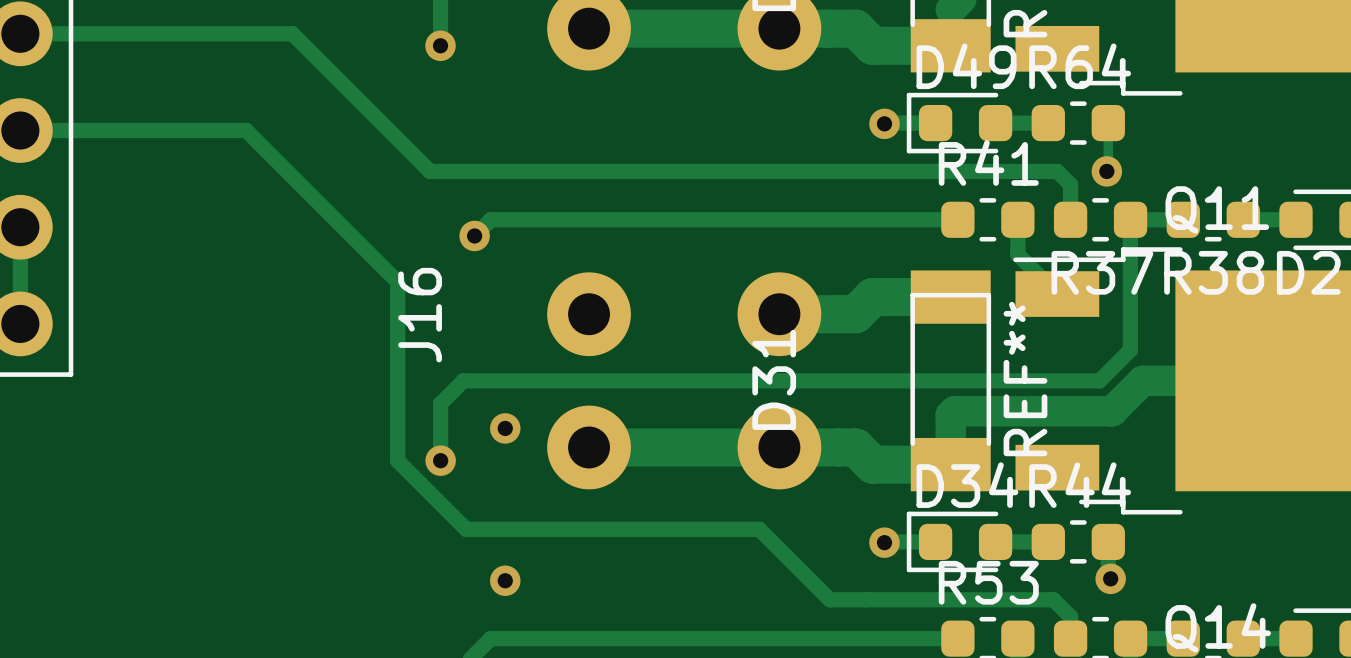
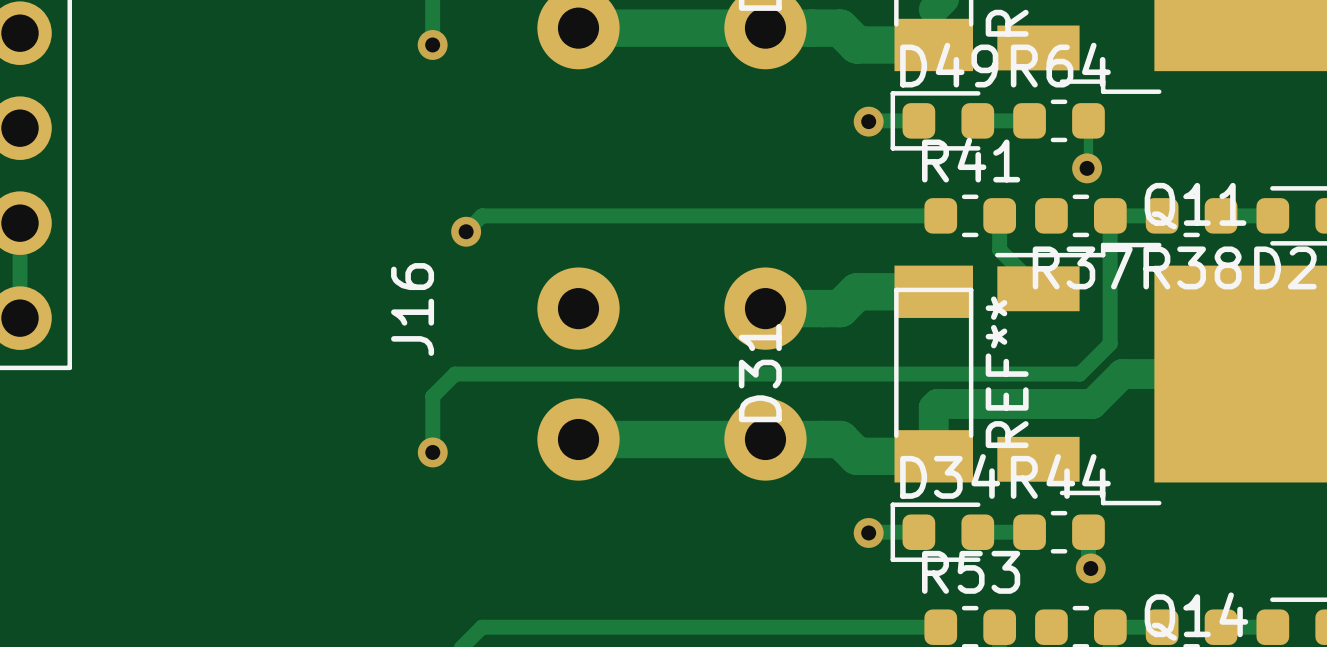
track: (20, 33) (292, 33) (430, 171) (1057, 171) (1070, 184) (1070, 219) -> none
track: (20, 130) (246, 130) (397, 281) (397, 460) (466, 529) (759, 529) (829, 599) (1053, 599) (1070, 616) (1070, 638) -> none
via: (505, 428) -> none
via: (505, 580) -> none

